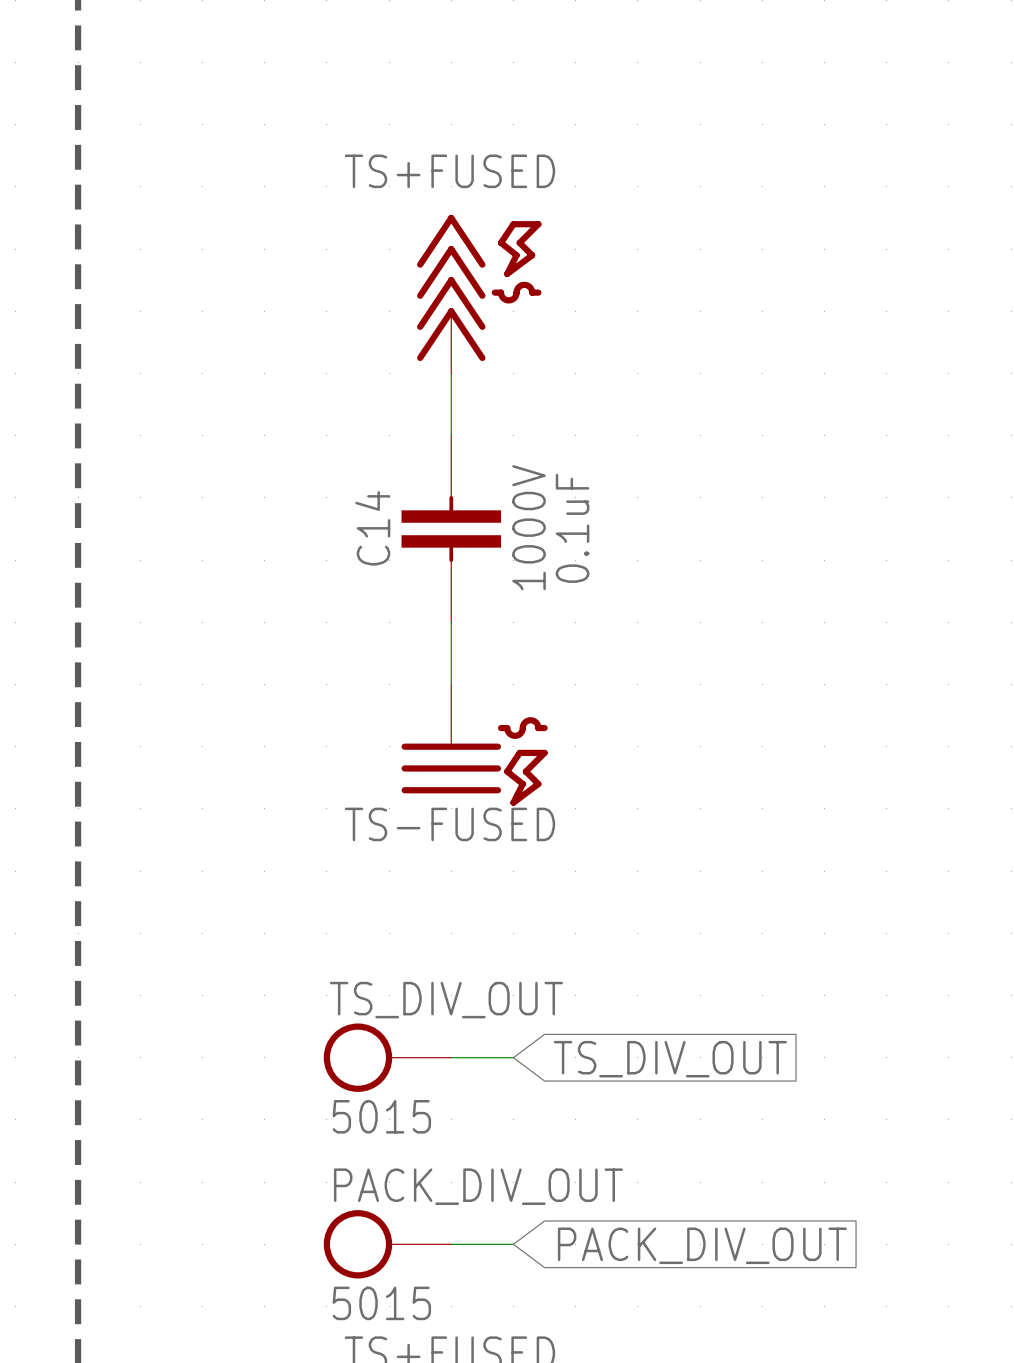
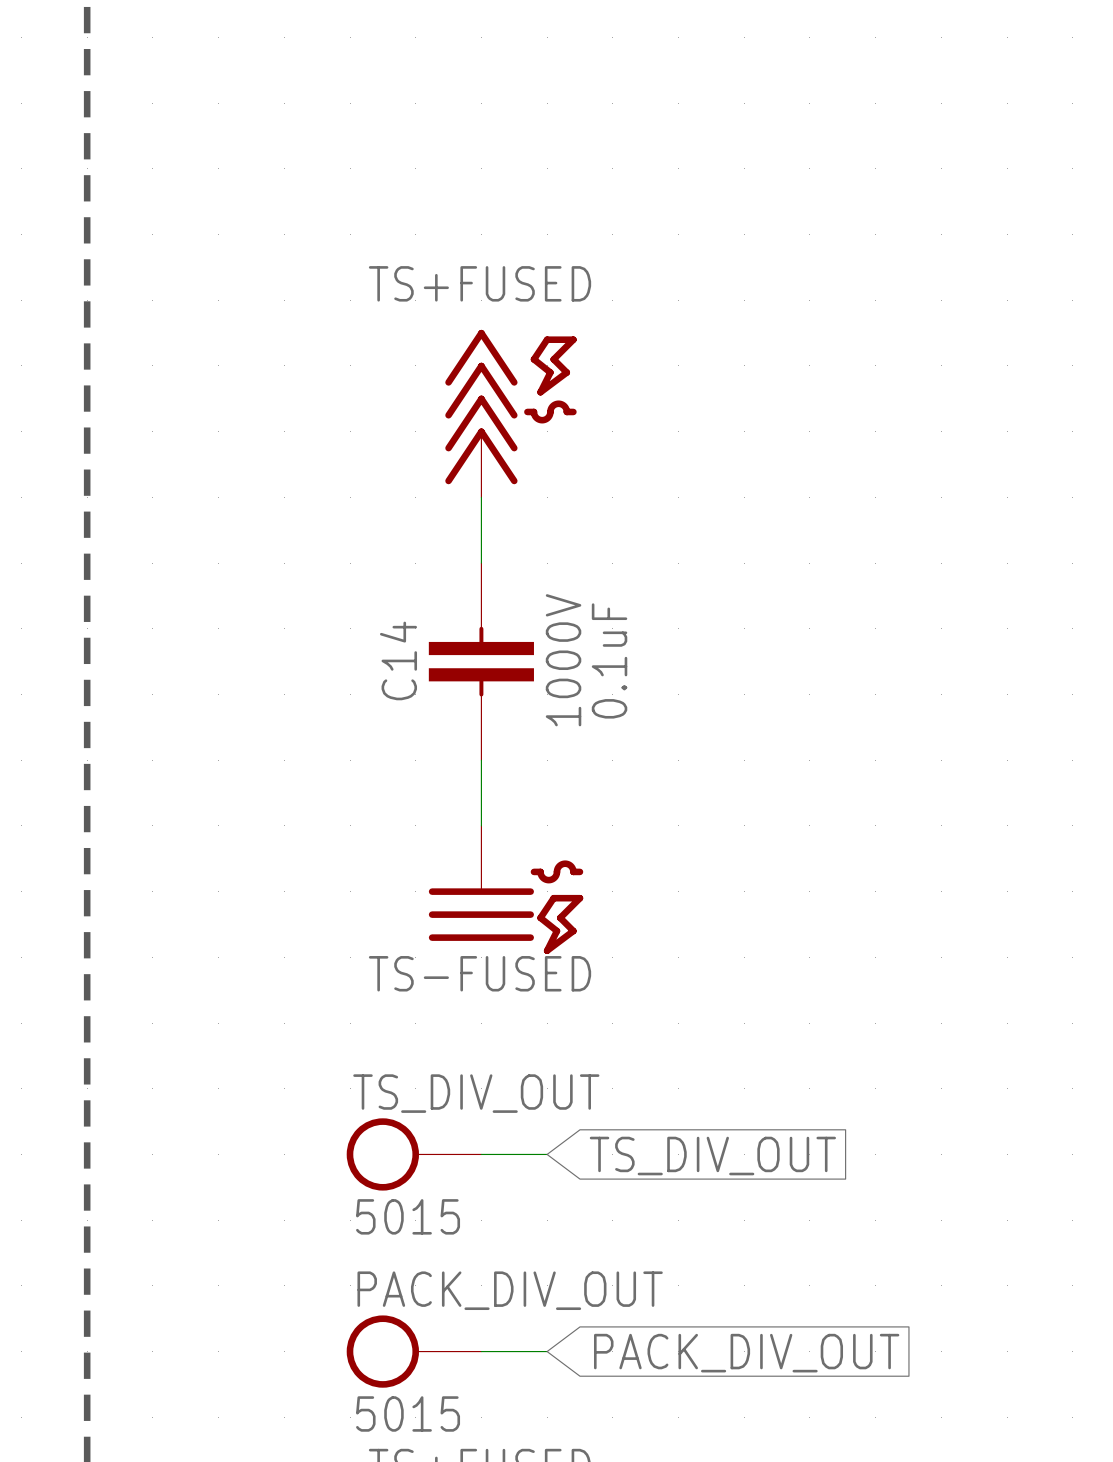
power symbol position: TS+FUSED (479, 294) -> TS+FUSED (510, 413)
C14 position: (451, 528) -> (481, 661)
power symbol position: TS-FUSED (474, 745) -> TS-FUSED (506, 889)

